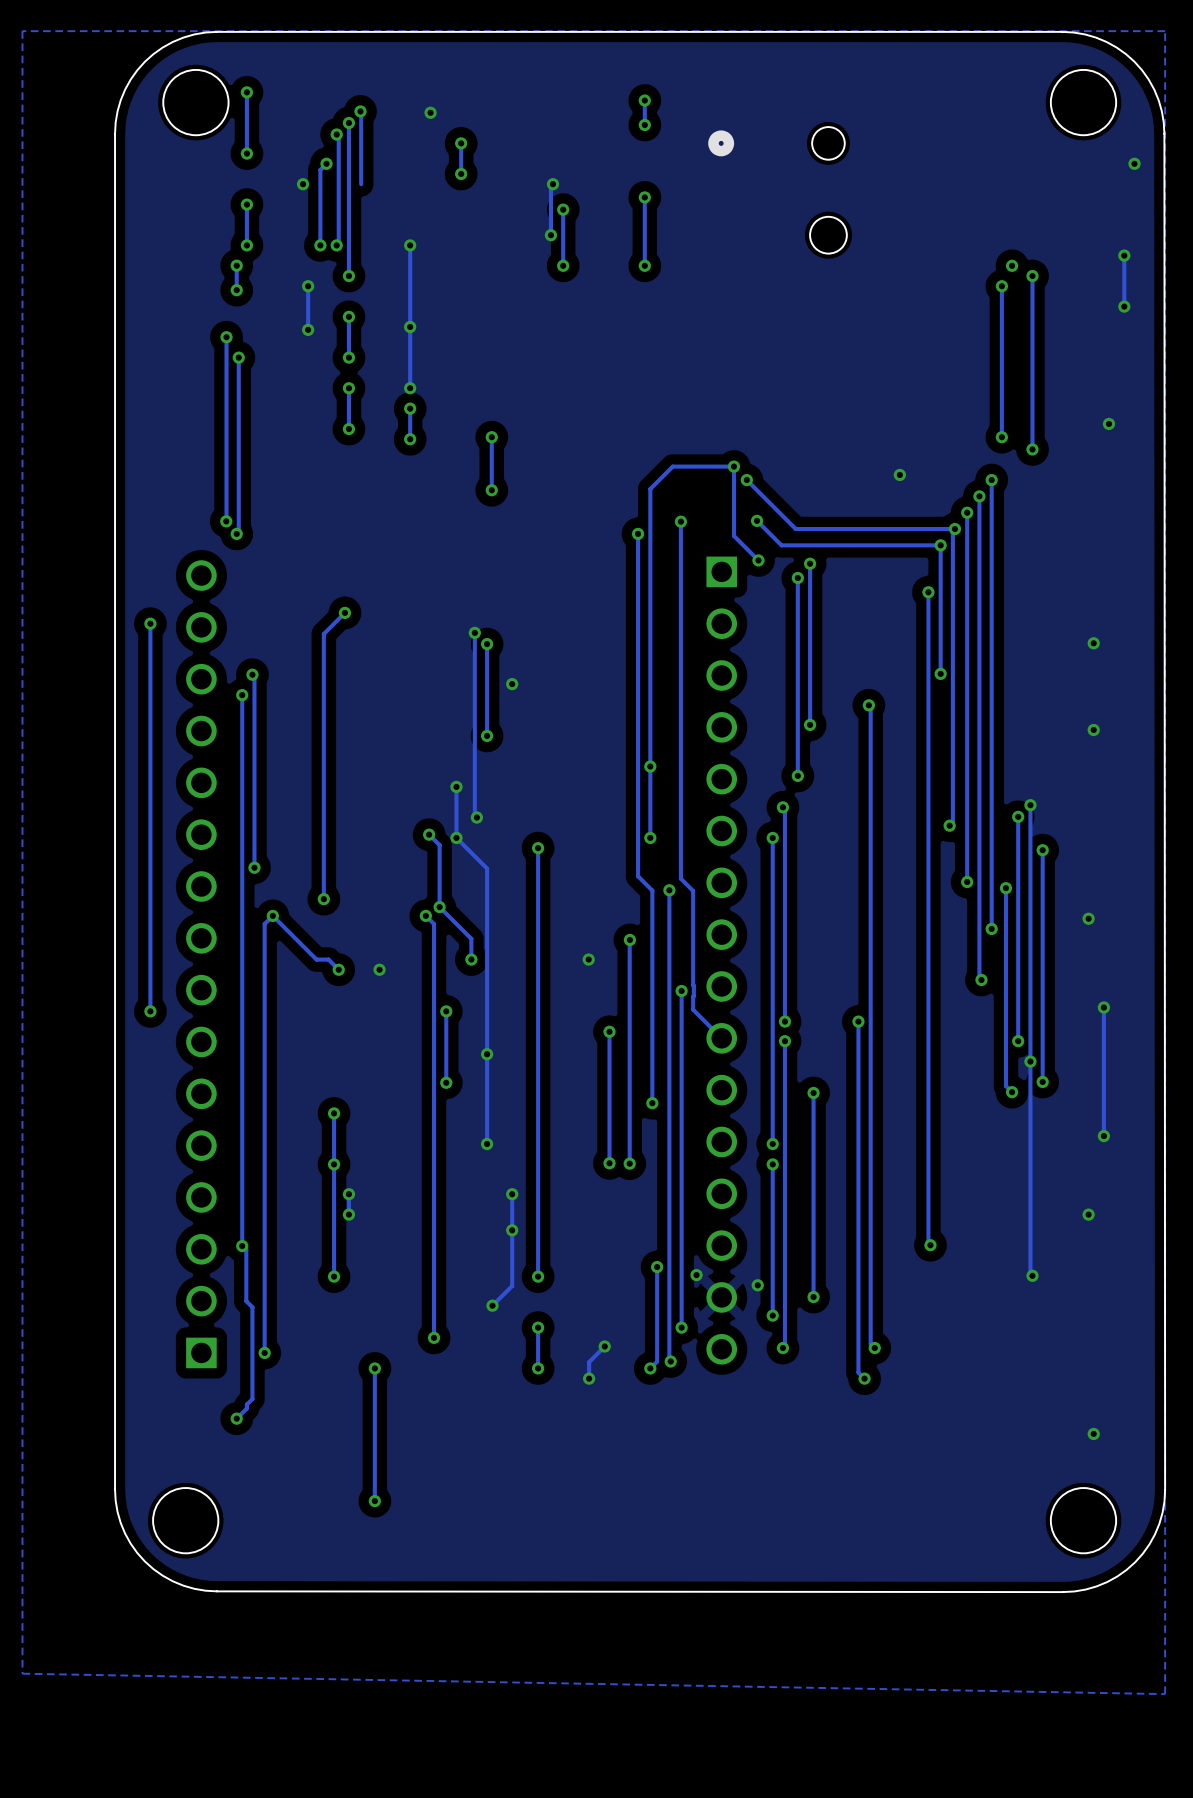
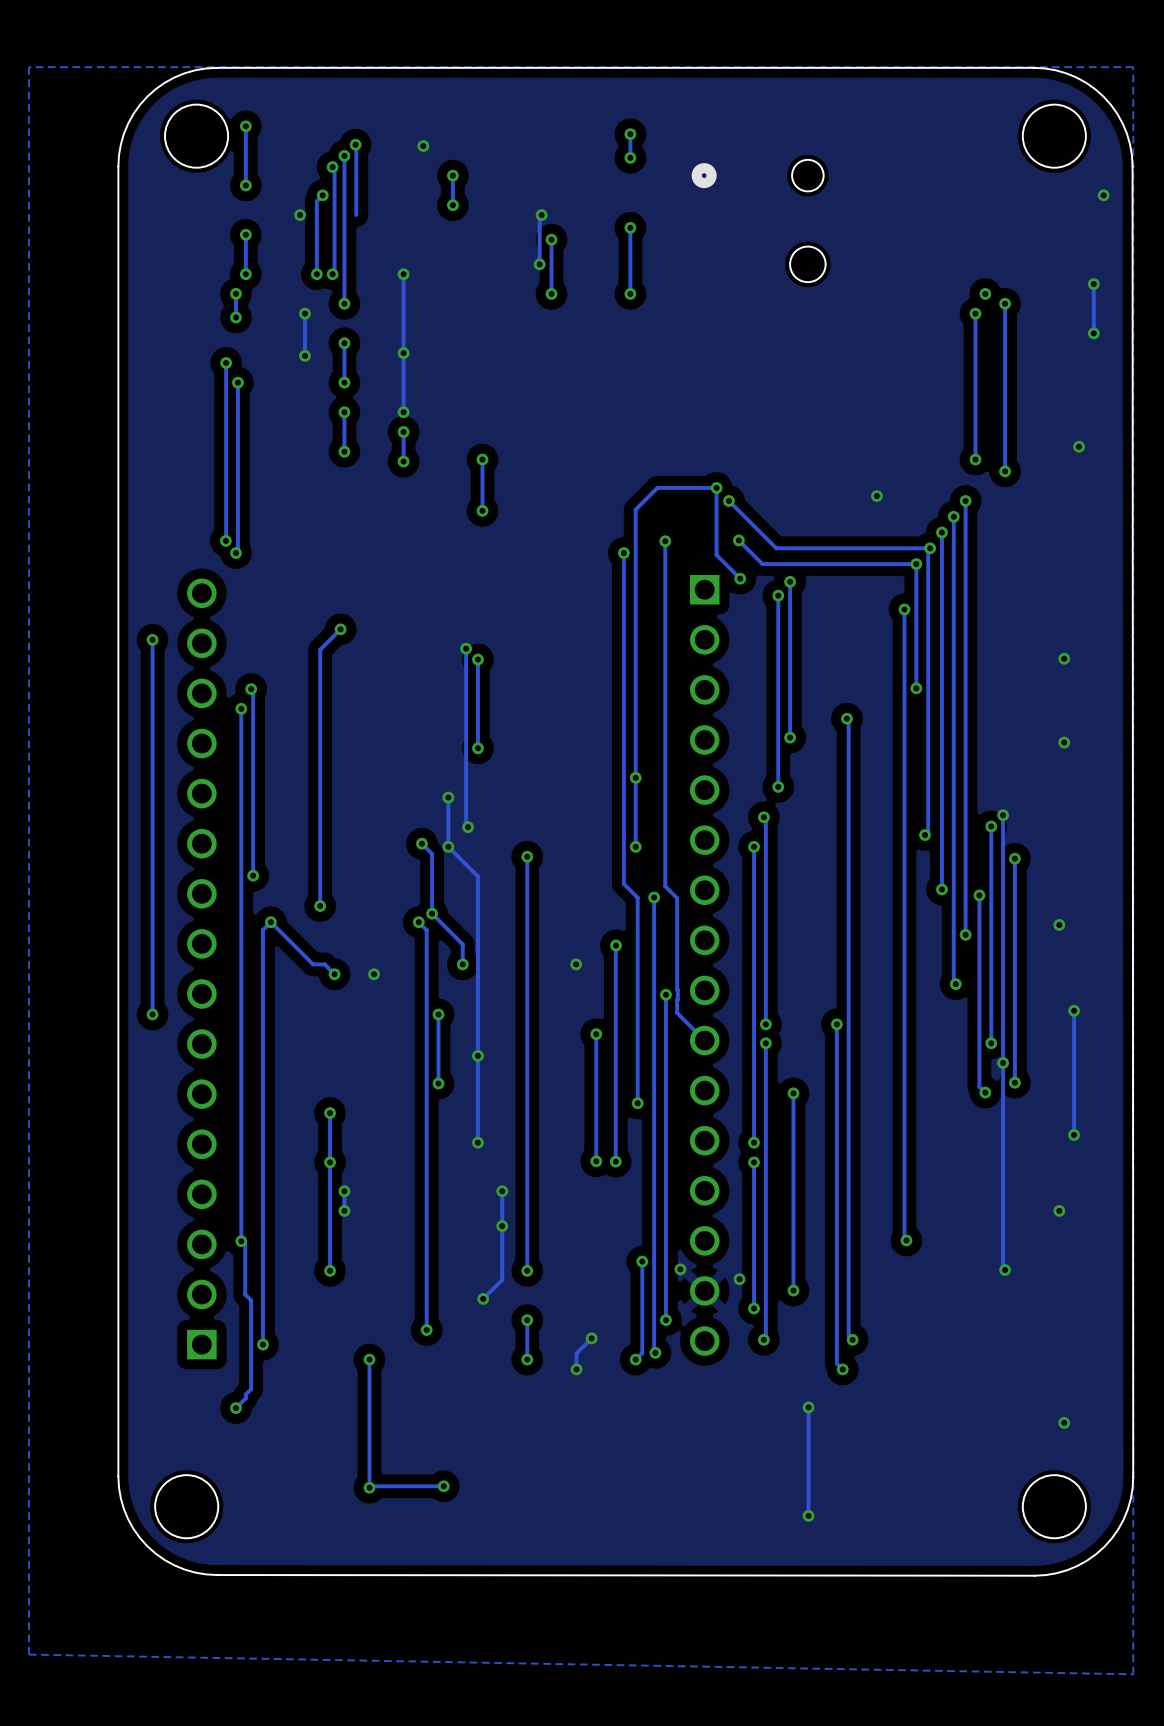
via: (512, 684) -> none
track: none -> (808, 1407) (808, 1515)
via: none -> (808, 1407)
track: none -> (443, 1486) (369, 1487)
via: none -> (443, 1486)
via: none -> (808, 1515)

